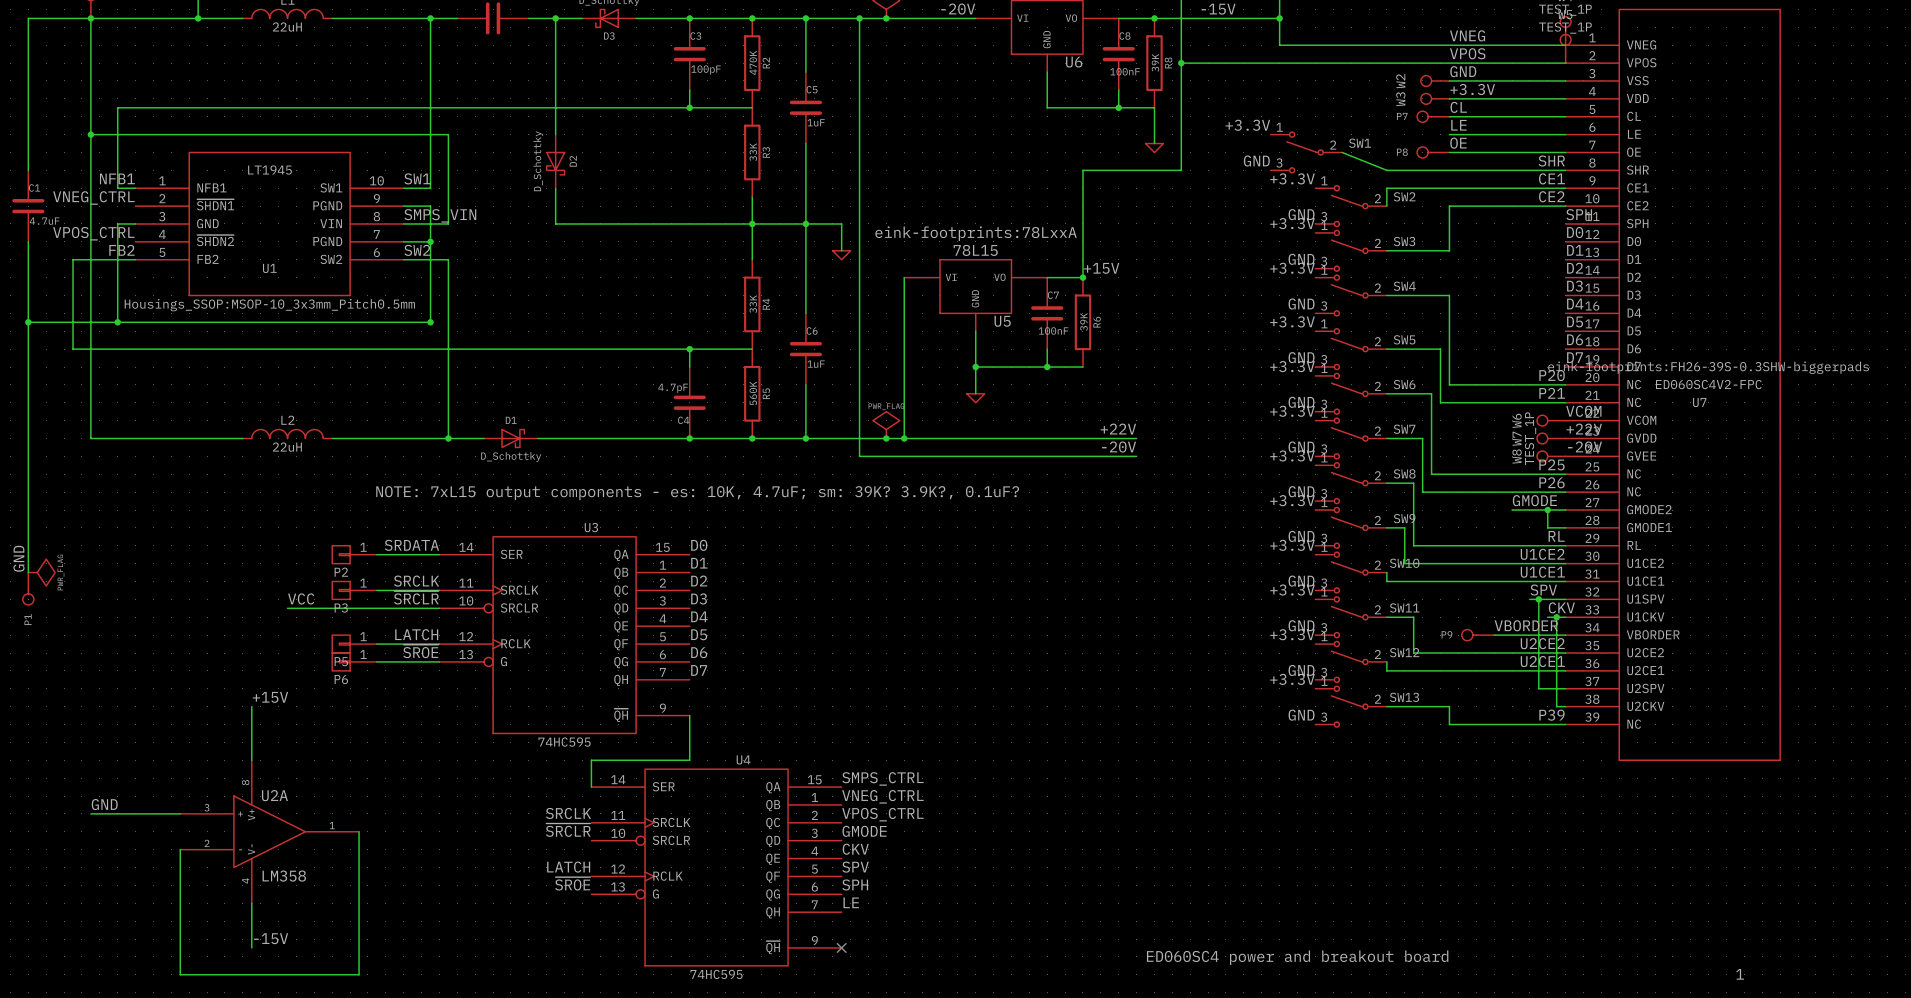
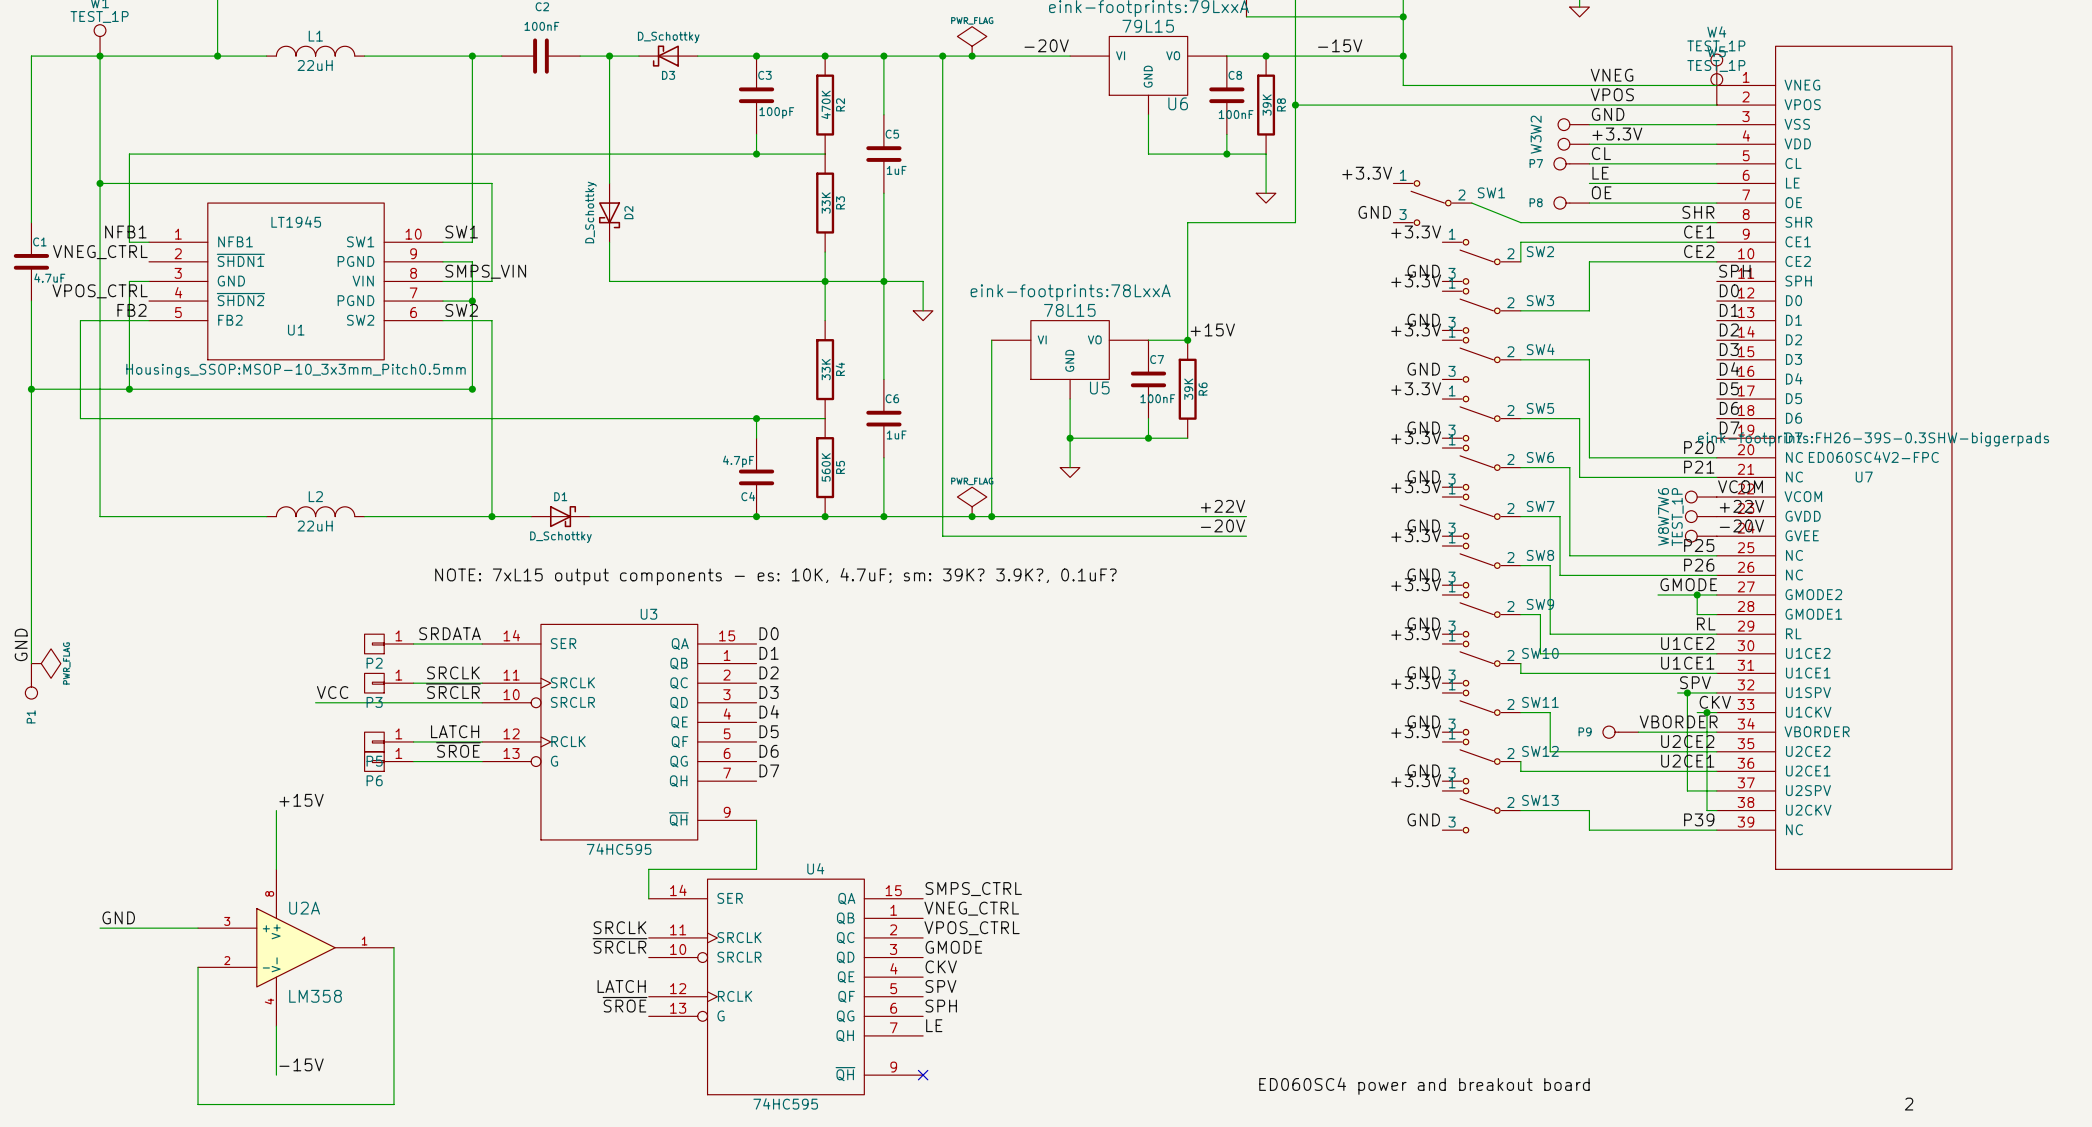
label: 1 (1740, 974) -> 2 (1909, 1104)

